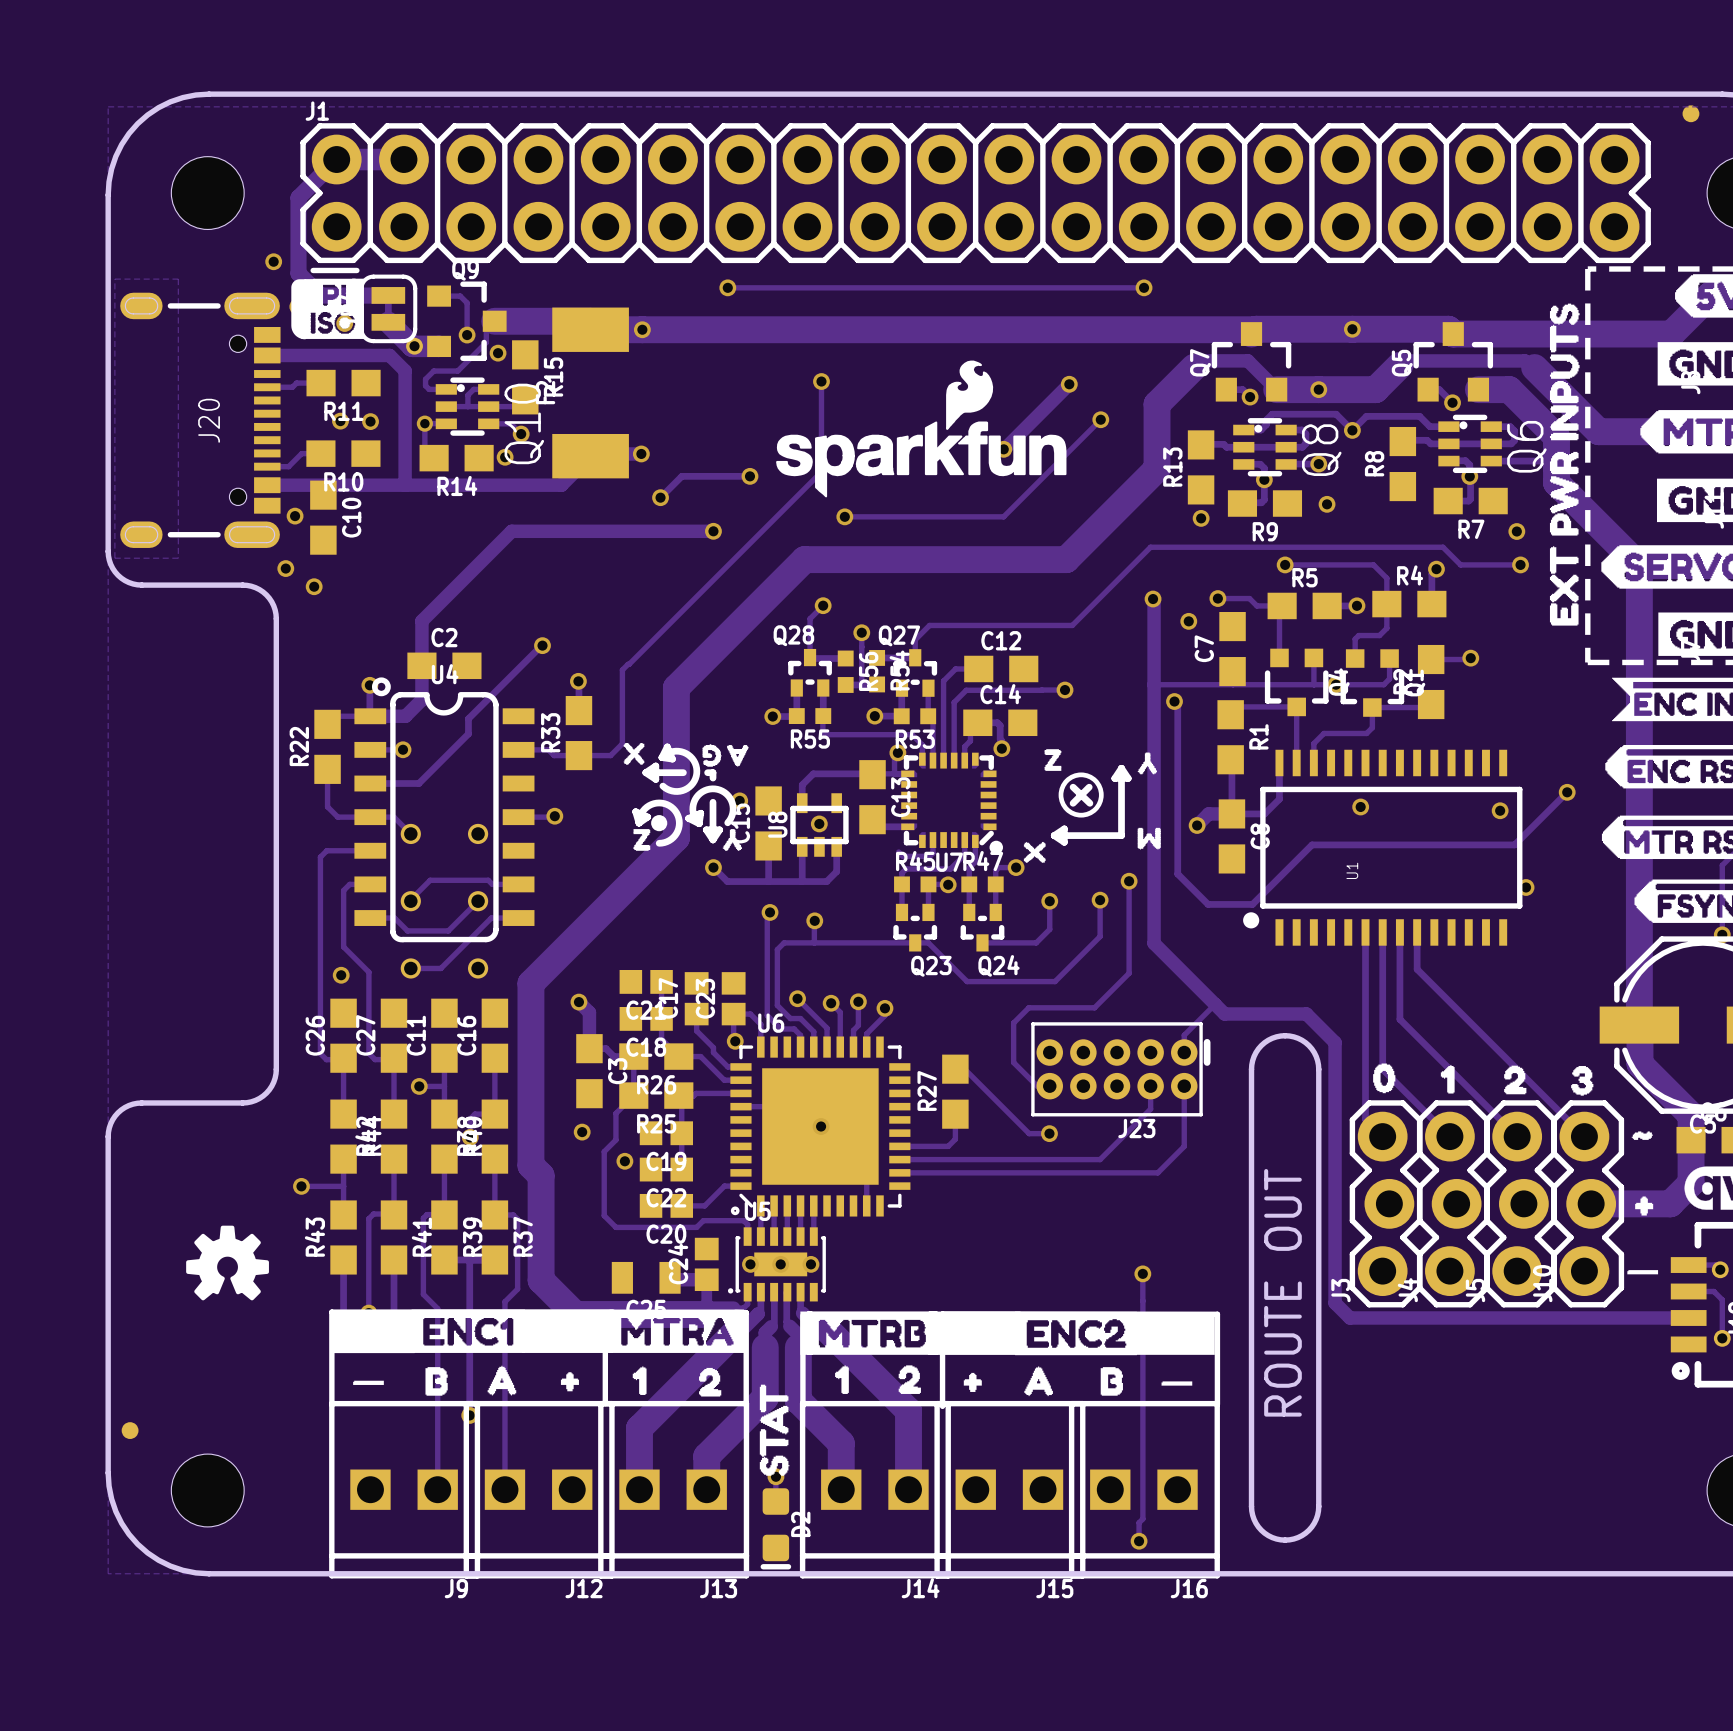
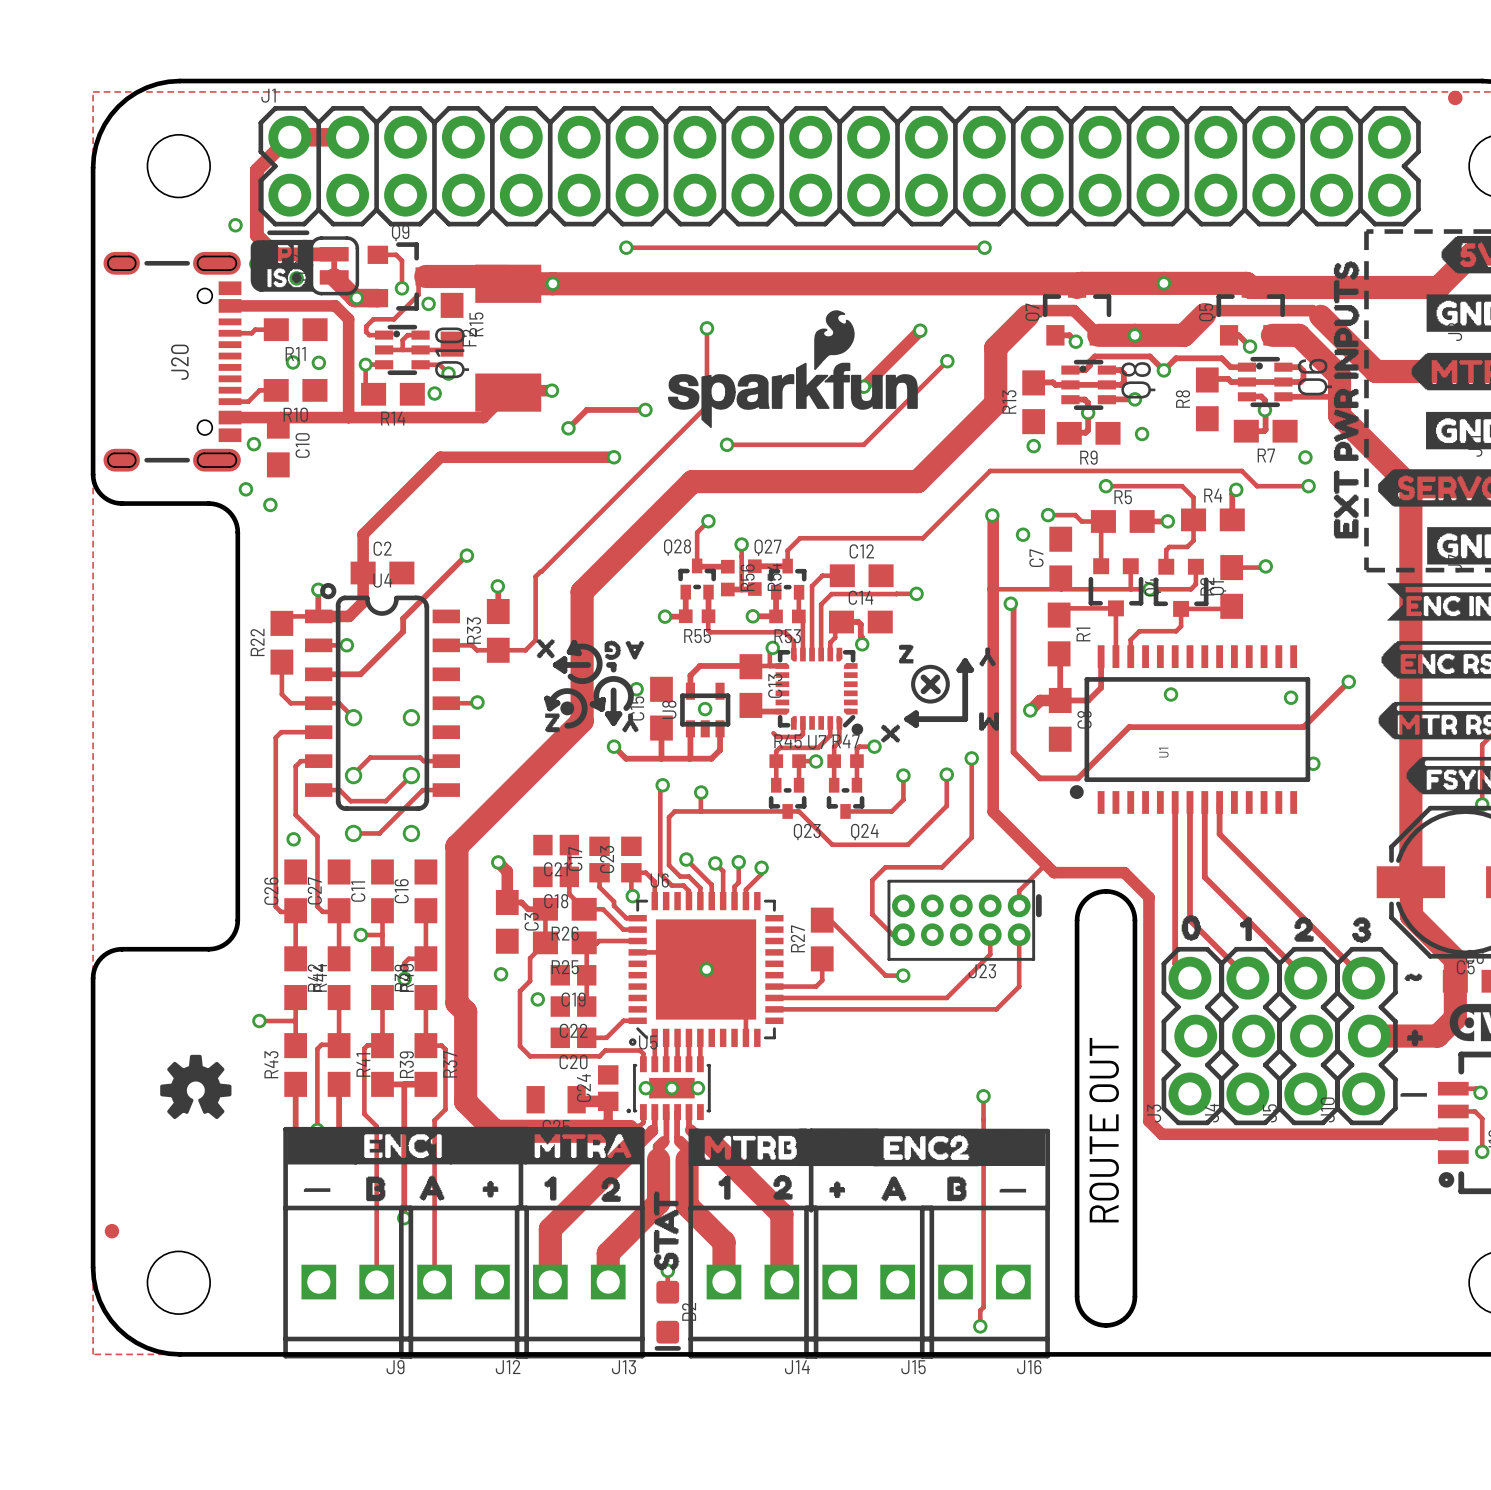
zone outline: (114, 279) (178, 279) (178, 558) (114, 558) (114, 279) -> none

